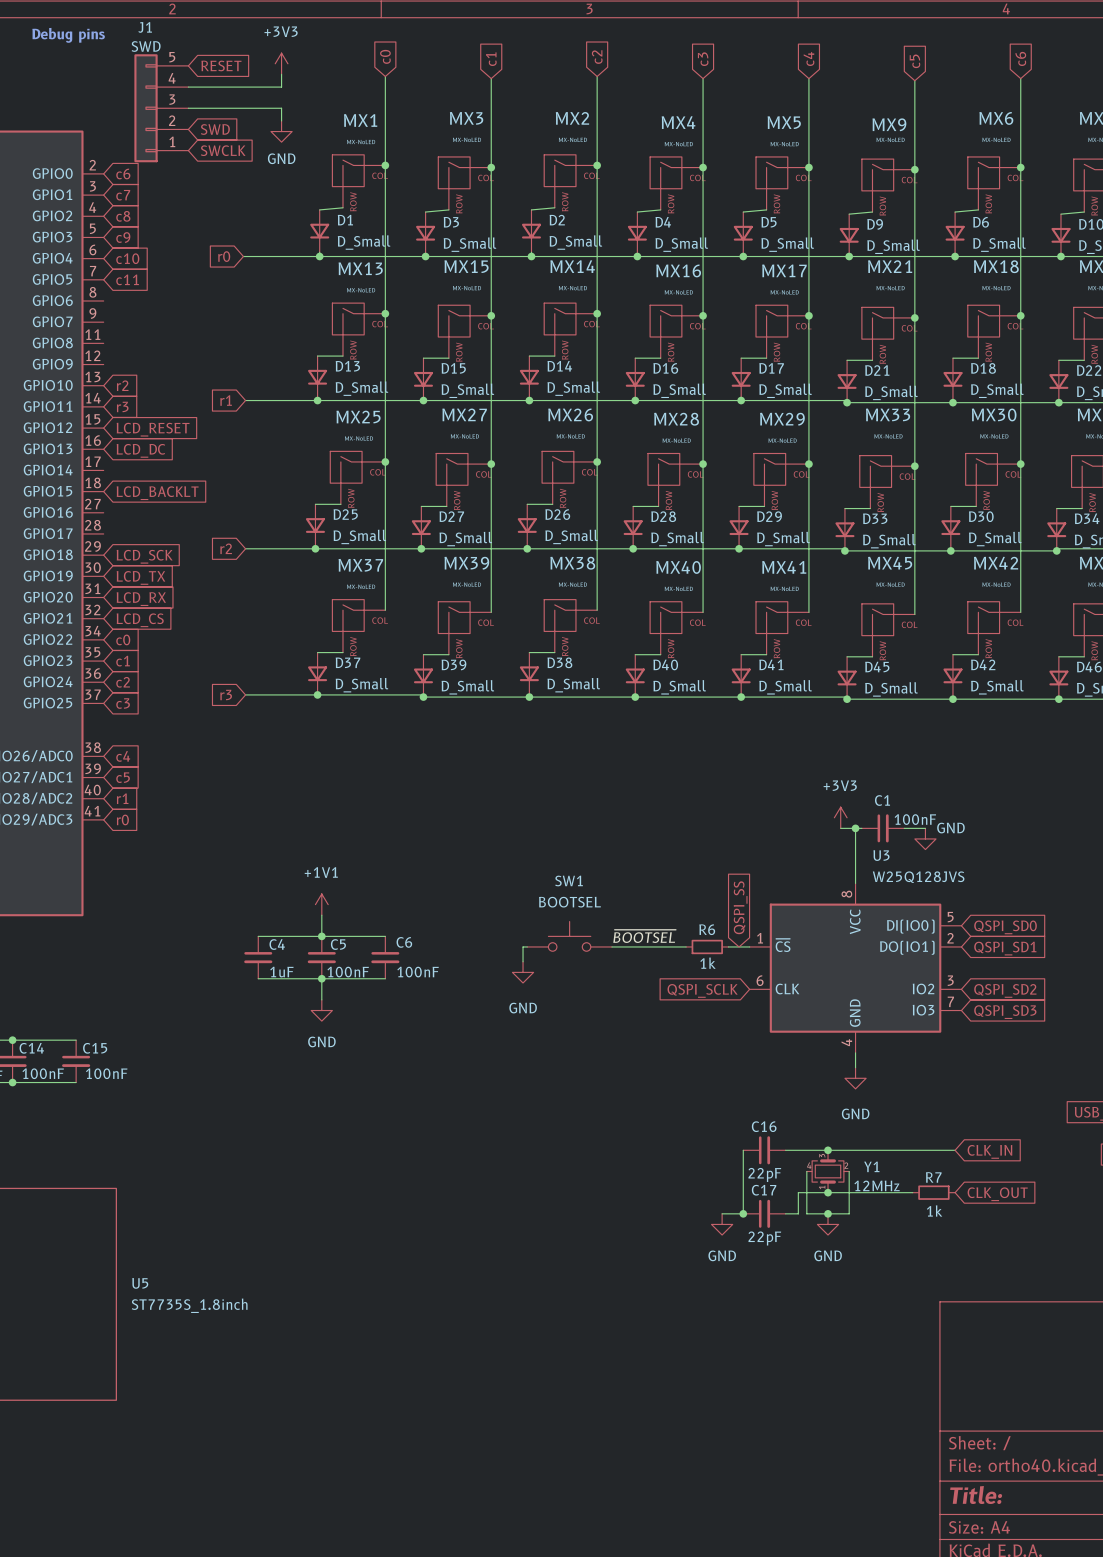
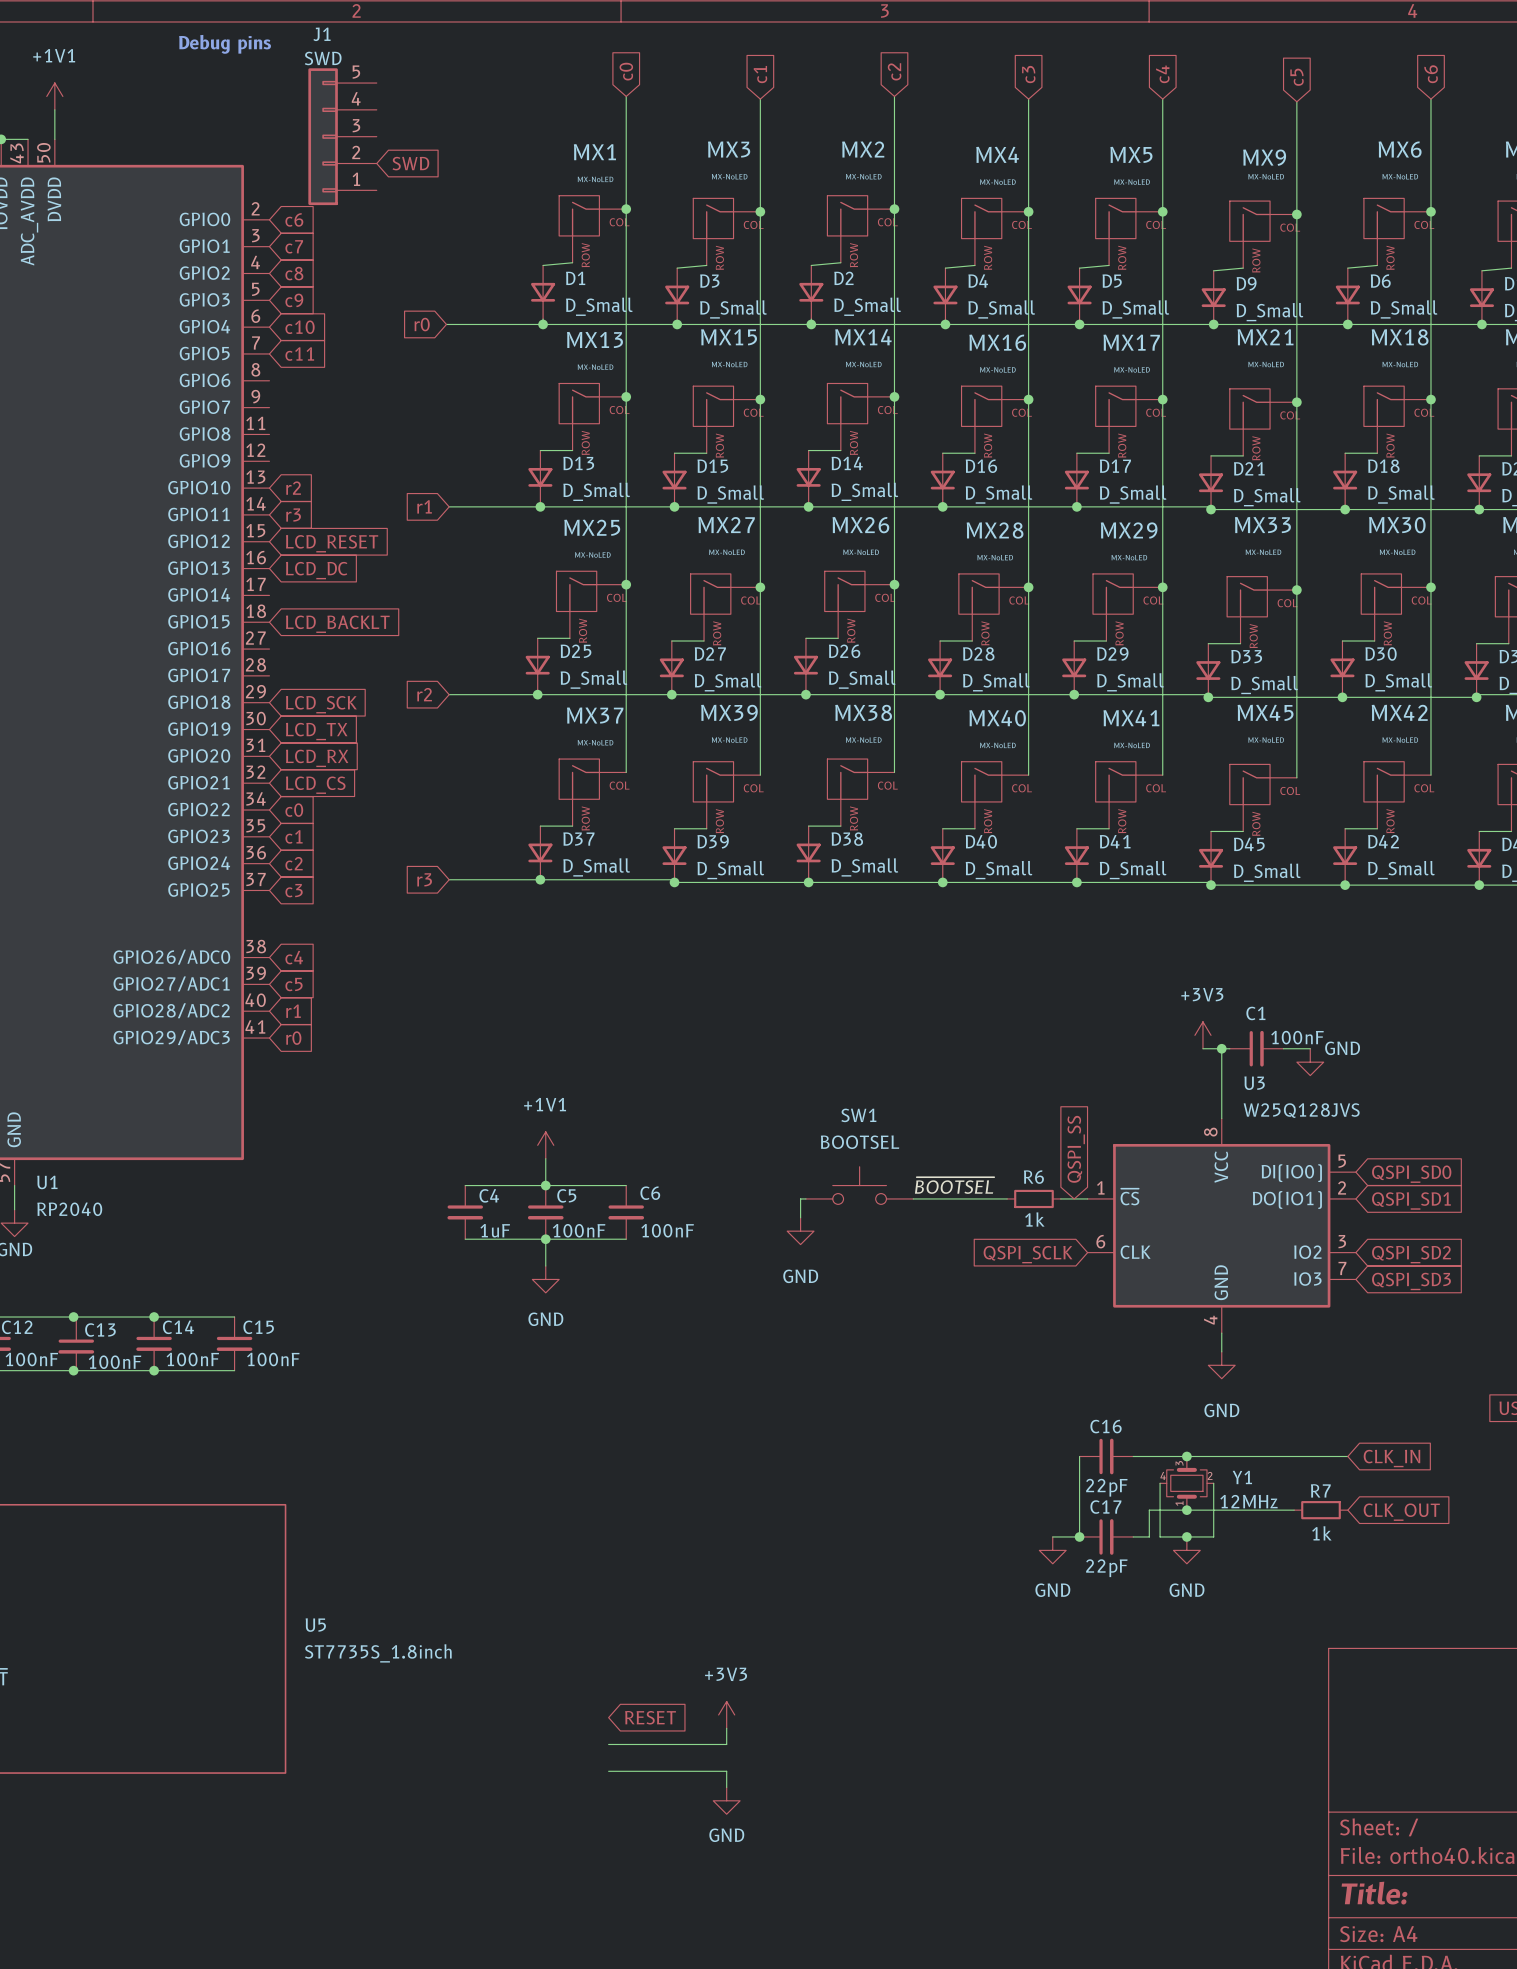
power symbol: +3V3 (281, 63) -> none
global label: RESET (221, 65) -> none
wire: (281, 74) (281, 87) (188, 87) -> none
wire: (188, 108) (281, 108) (281, 120) -> none
power symbol: GND (281, 131) -> none
global label: SWCLK (223, 150) -> none
power symbol: none -> +3V3 (726, 1714)
global label: none -> RESET (650, 1717)
wire: none -> (726, 1728) (726, 1744) (608, 1744)
wire: none -> (608, 1771) (726, 1771) (726, 1787)
power symbol: none -> GND (726, 1800)

